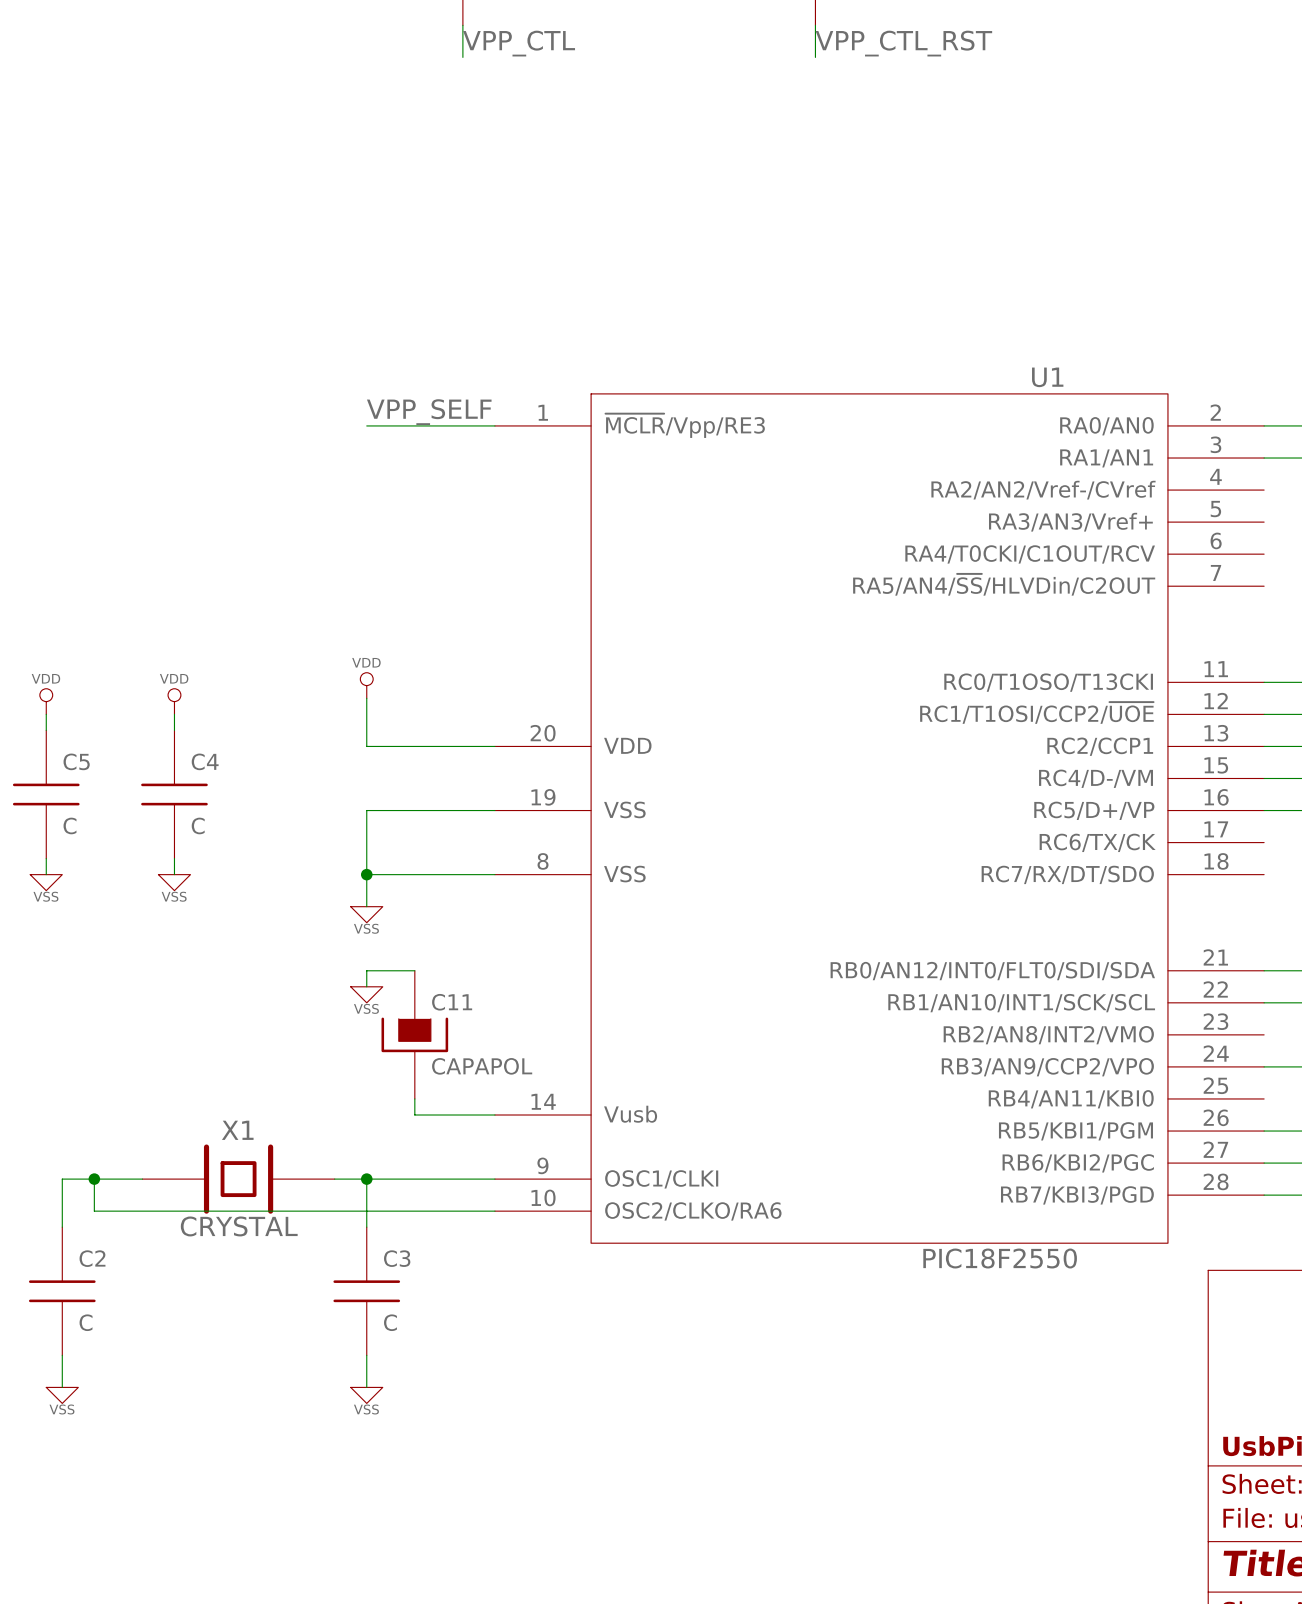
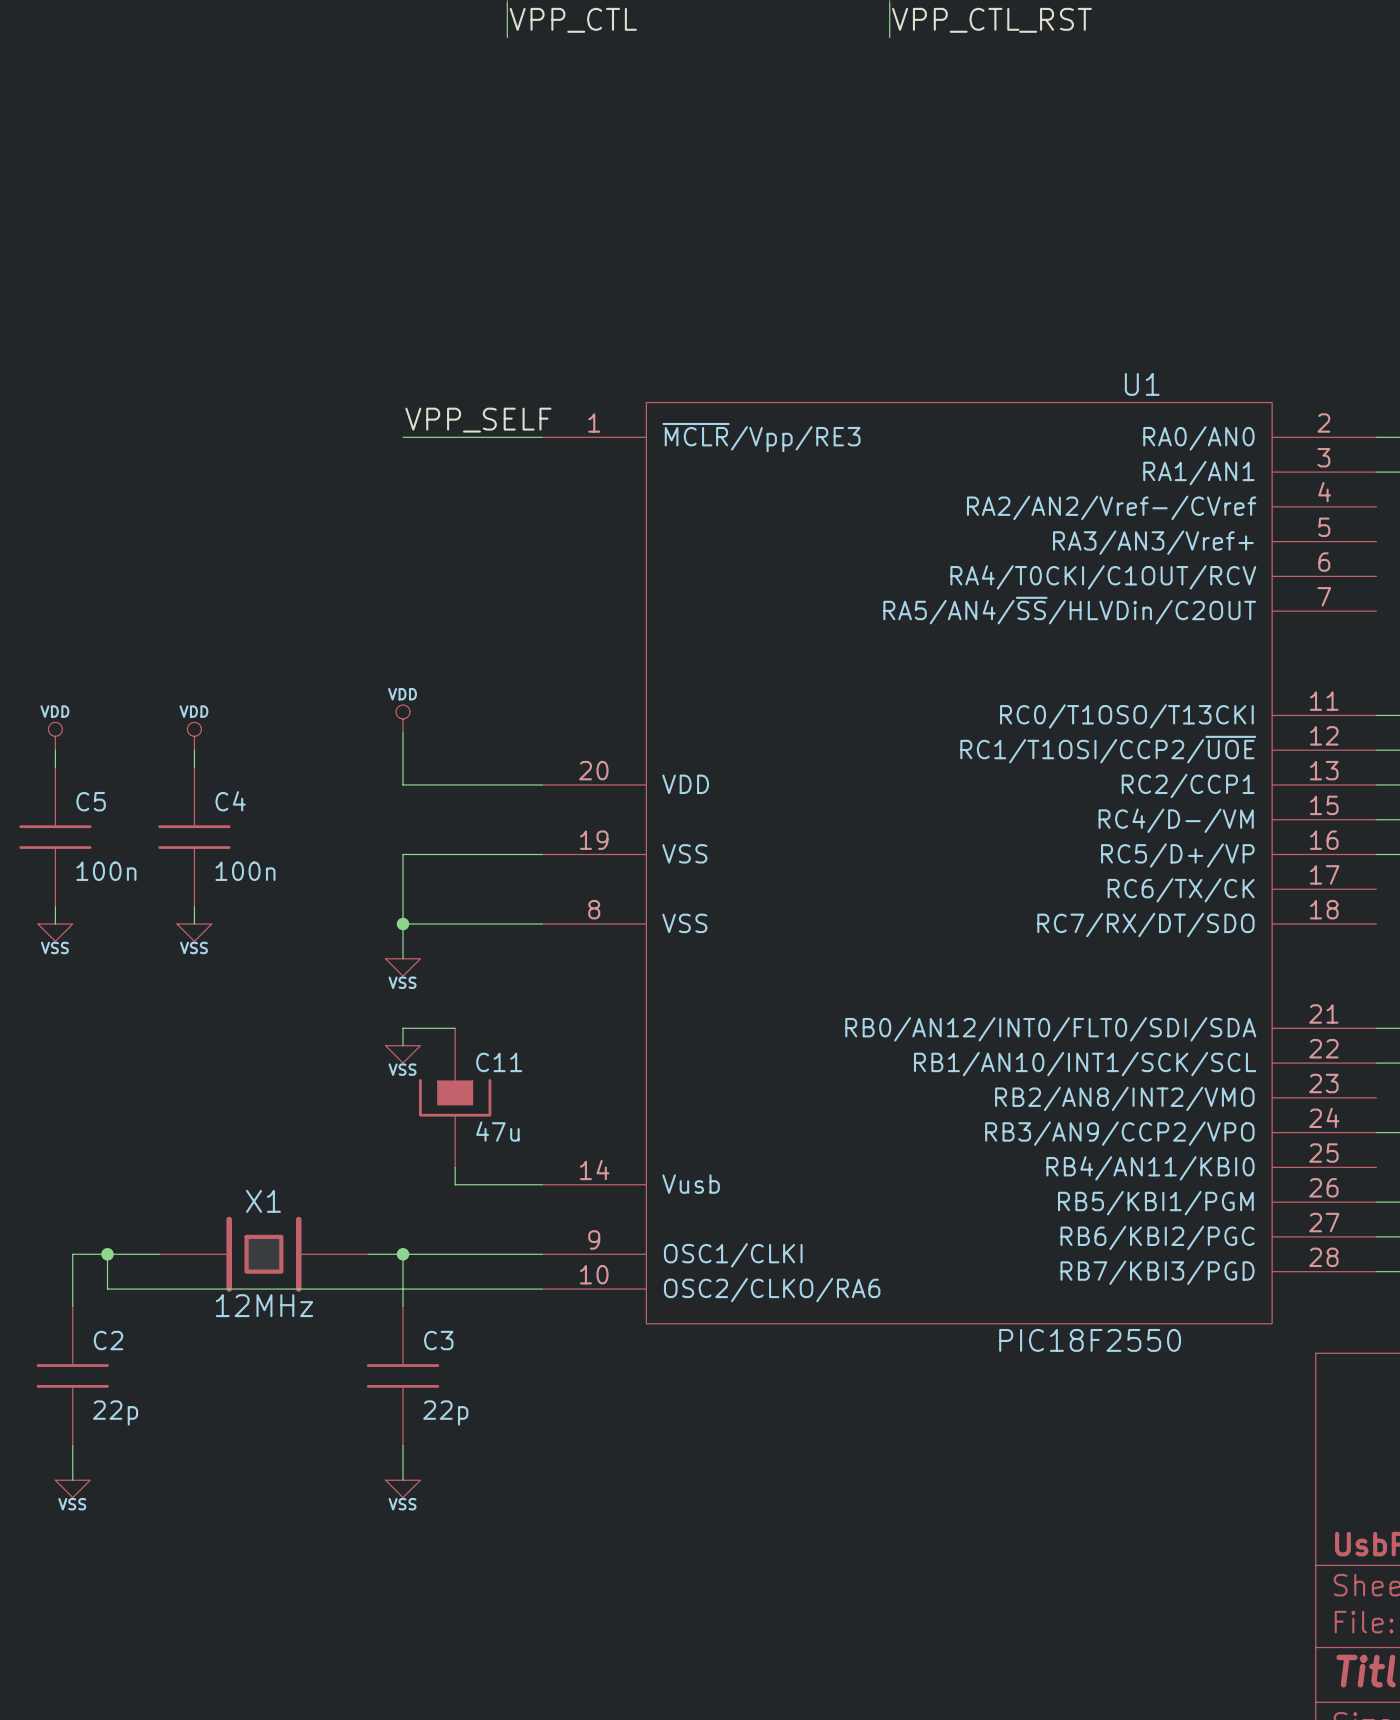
C5 value: C (69, 825) -> 100n (106, 871)
C4 value: C (198, 825) -> 100n (245, 871)
C11 value: CAPAPOL (482, 1066) -> 47u (497, 1131)
X1 value: CRYSTAL (239, 1226) -> 12MHz (264, 1305)
C2 value: C (86, 1322) -> 22p (115, 1412)
C3 value: C (390, 1322) -> 22p (445, 1412)

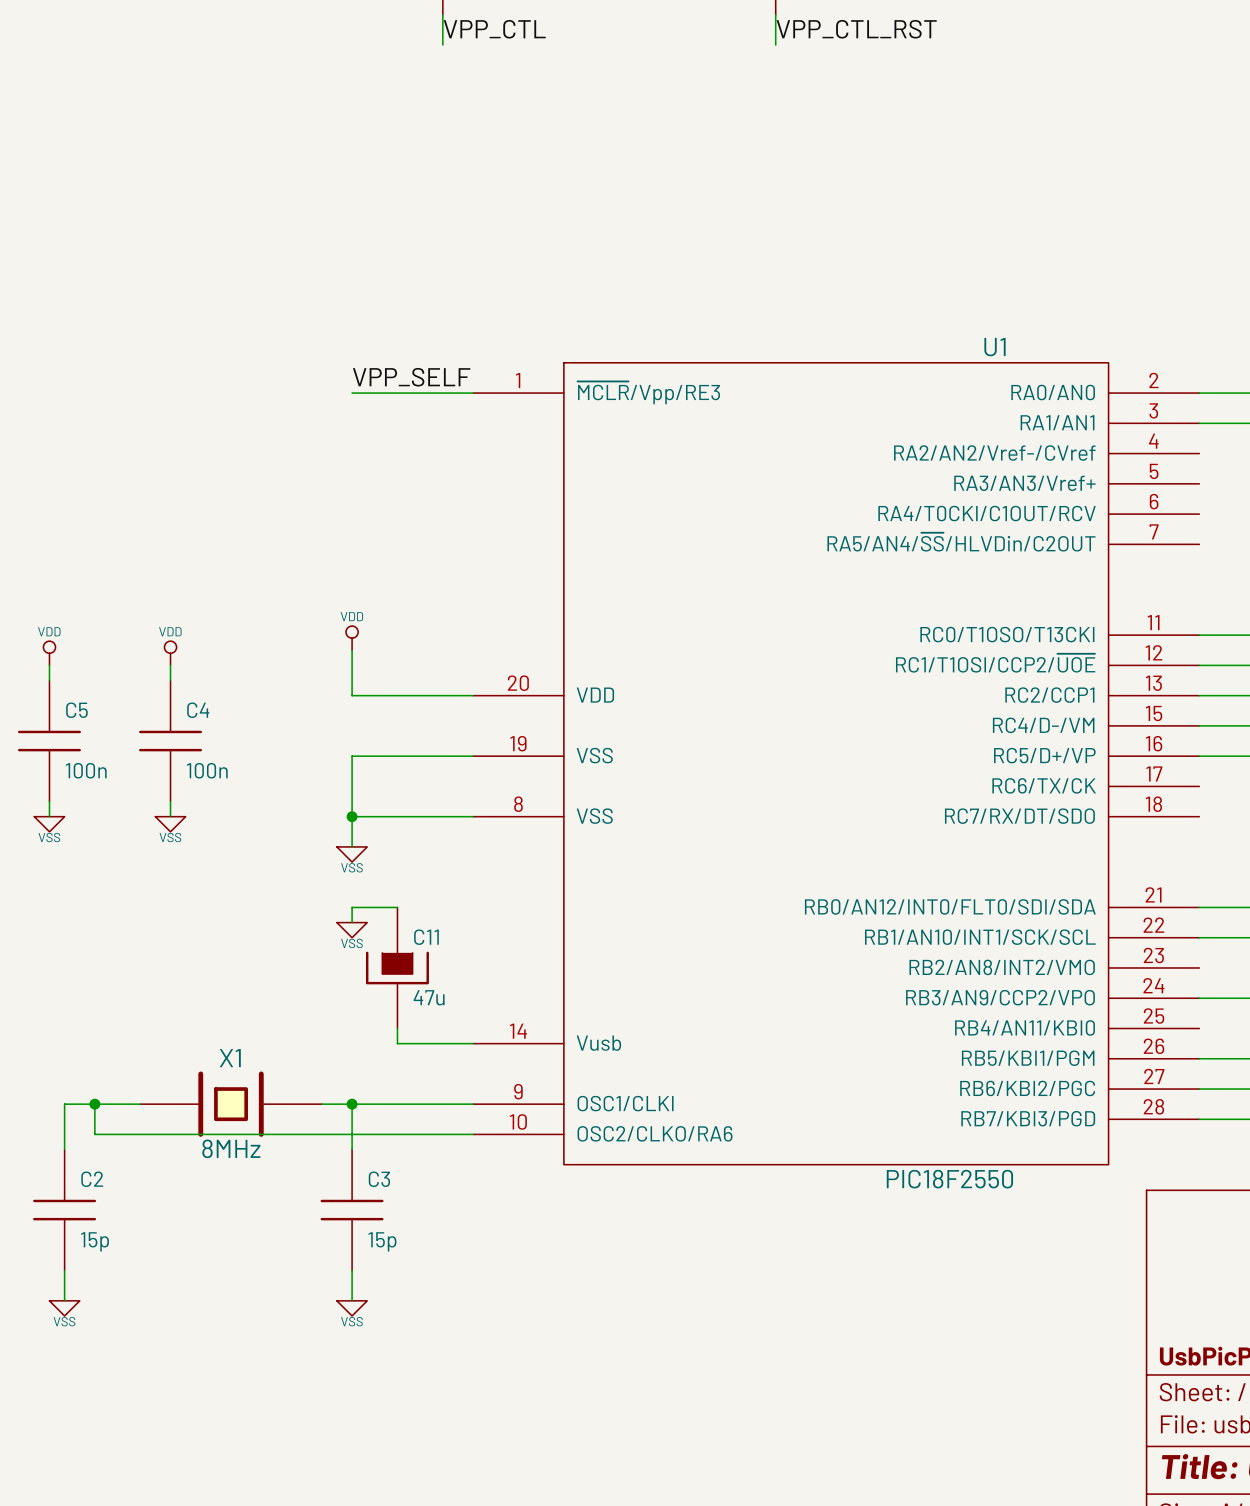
X1 value: 12MHz (264, 1305) -> 8MHz (231, 1148)
C2 value: 22p (115, 1412) -> 15p (94, 1241)
C3 value: 22p (445, 1412) -> 15p (382, 1241)

